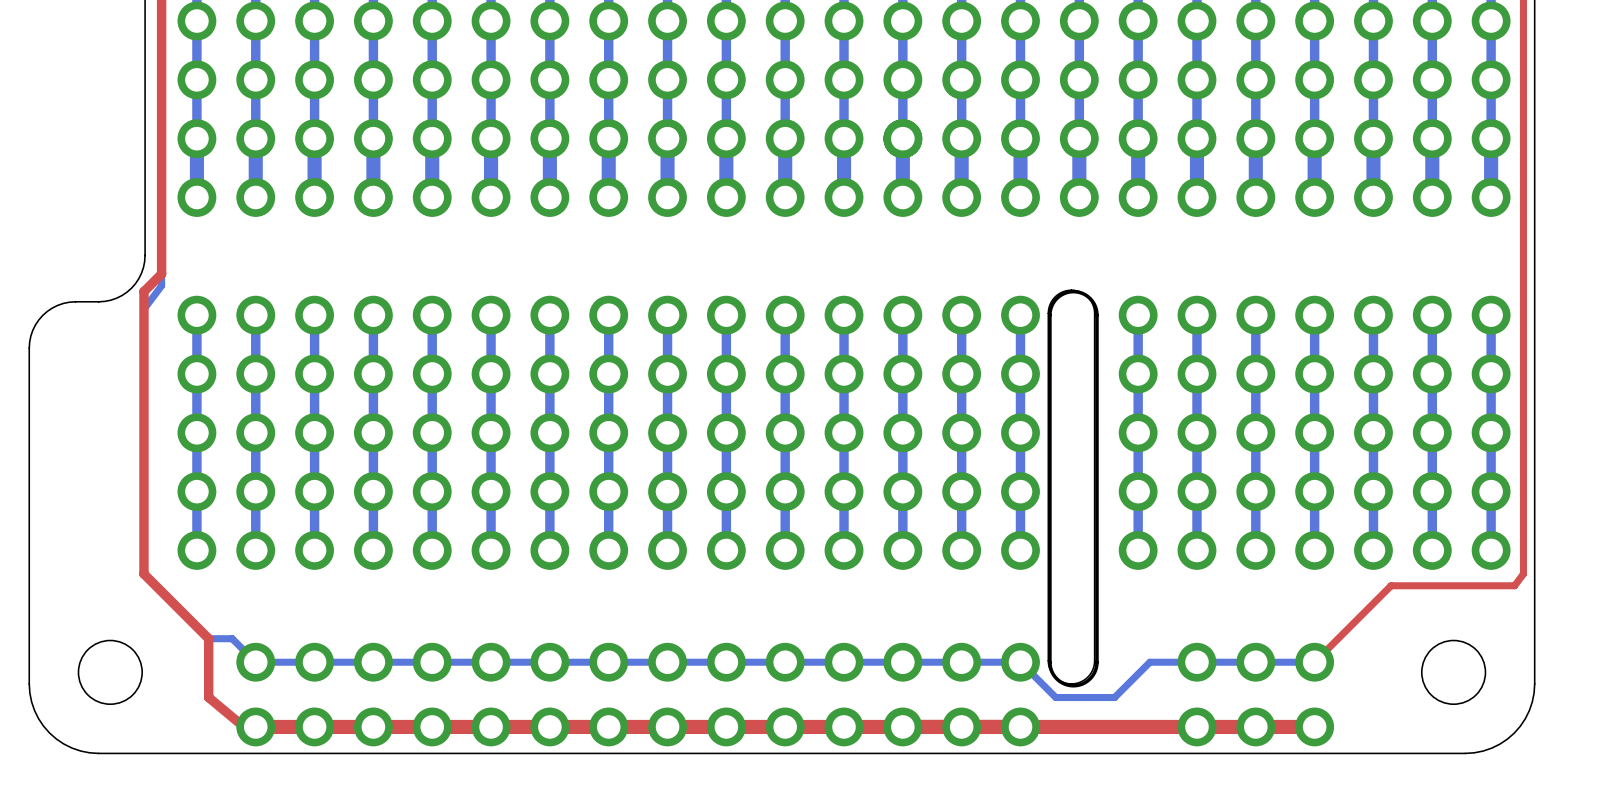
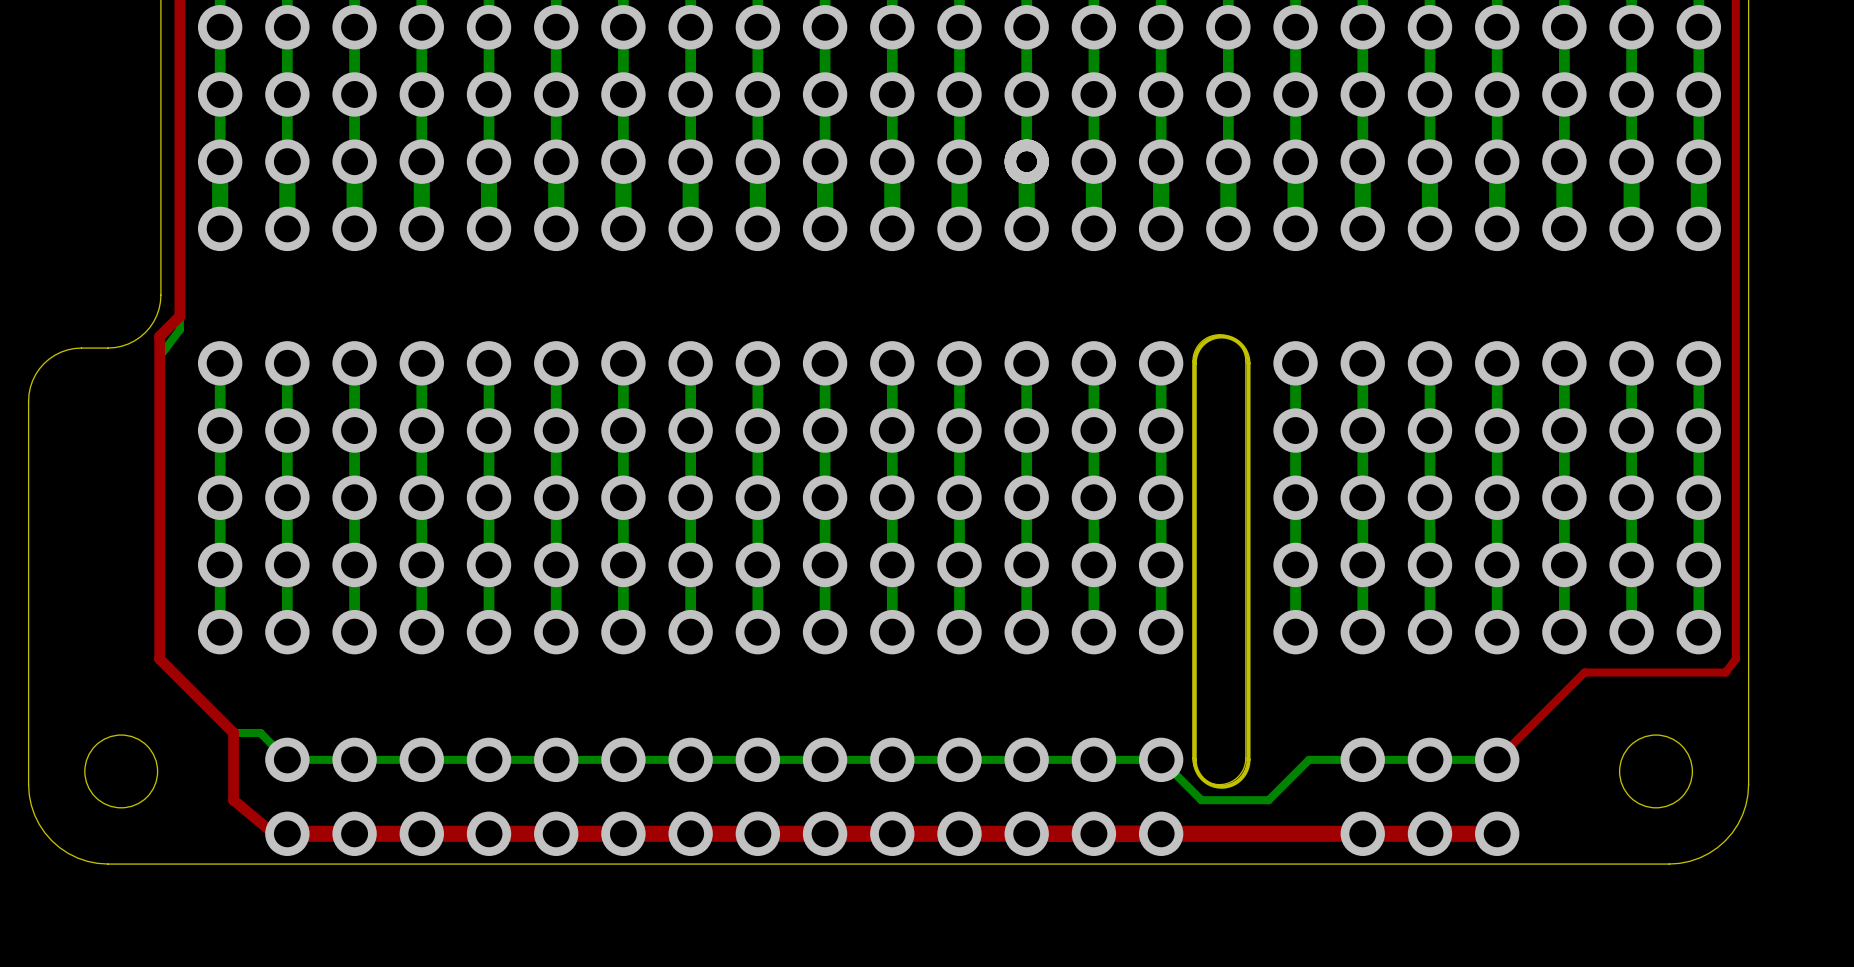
via: (902, 138) -> none

